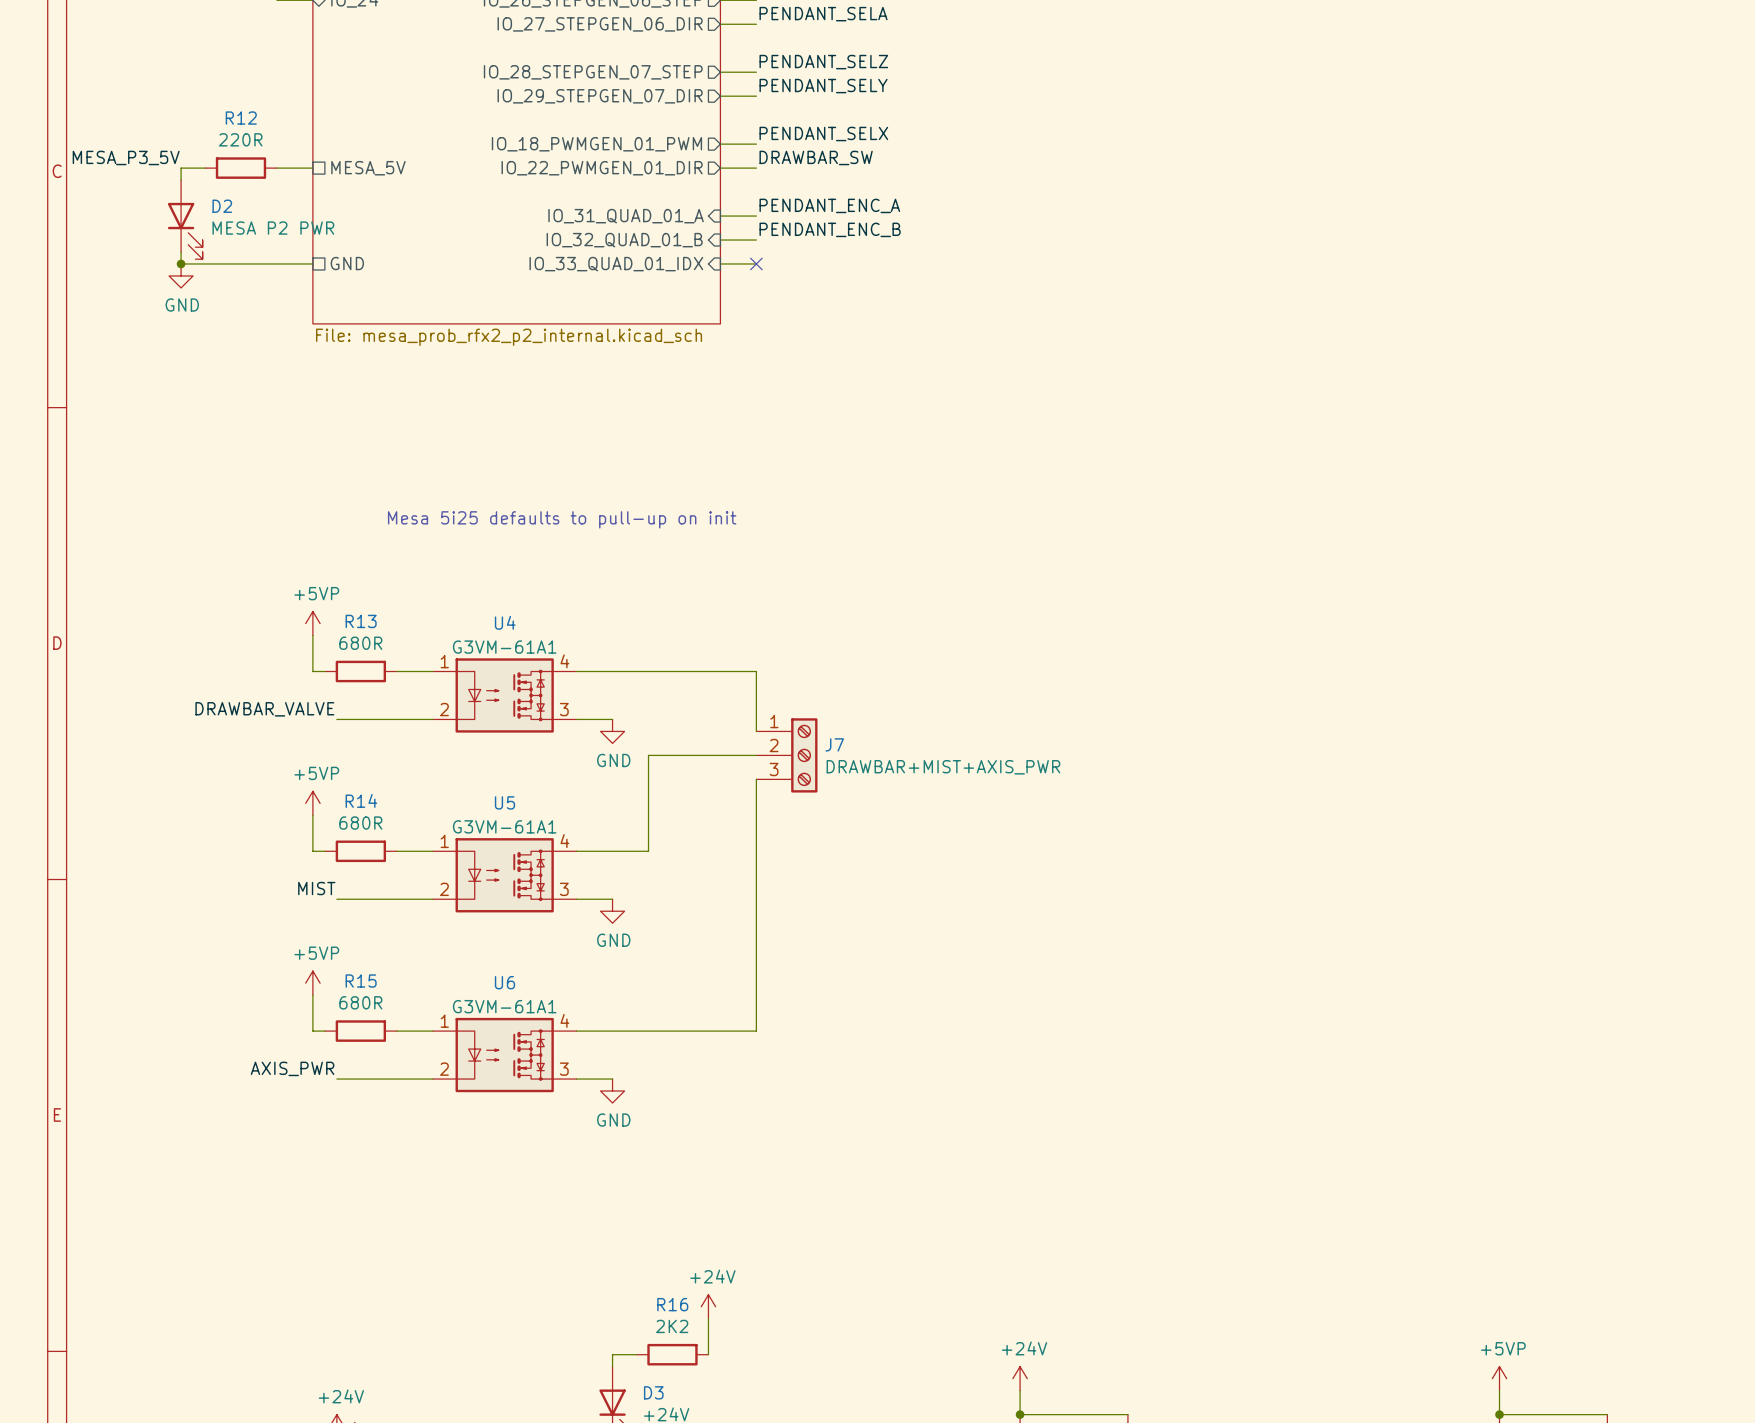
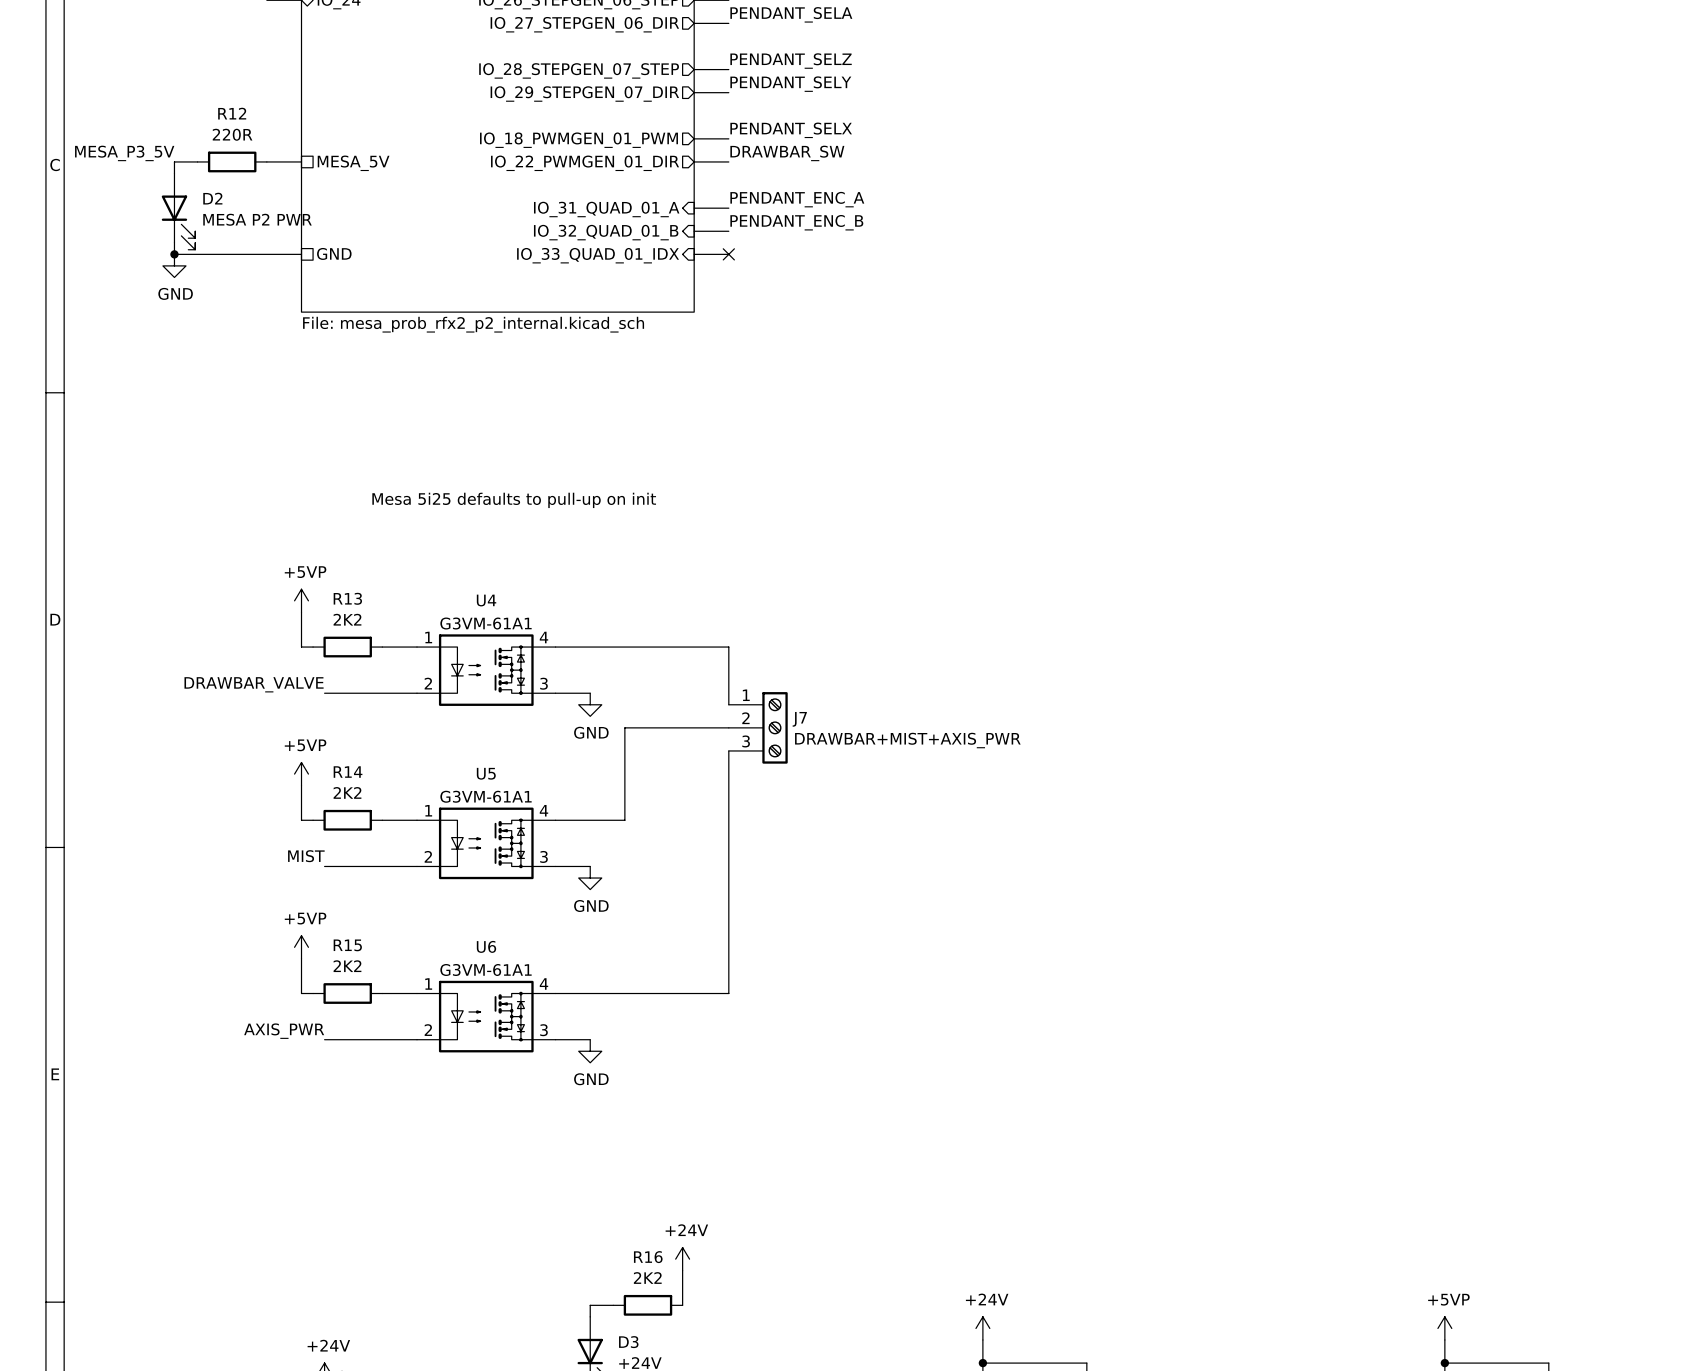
R13 value: 680R (360, 643) -> 2K2 (347, 619)
R14 value: 680R (360, 823) -> 2K2 (347, 792)
R15 value: 680R (360, 1002) -> 2K2 (347, 966)

